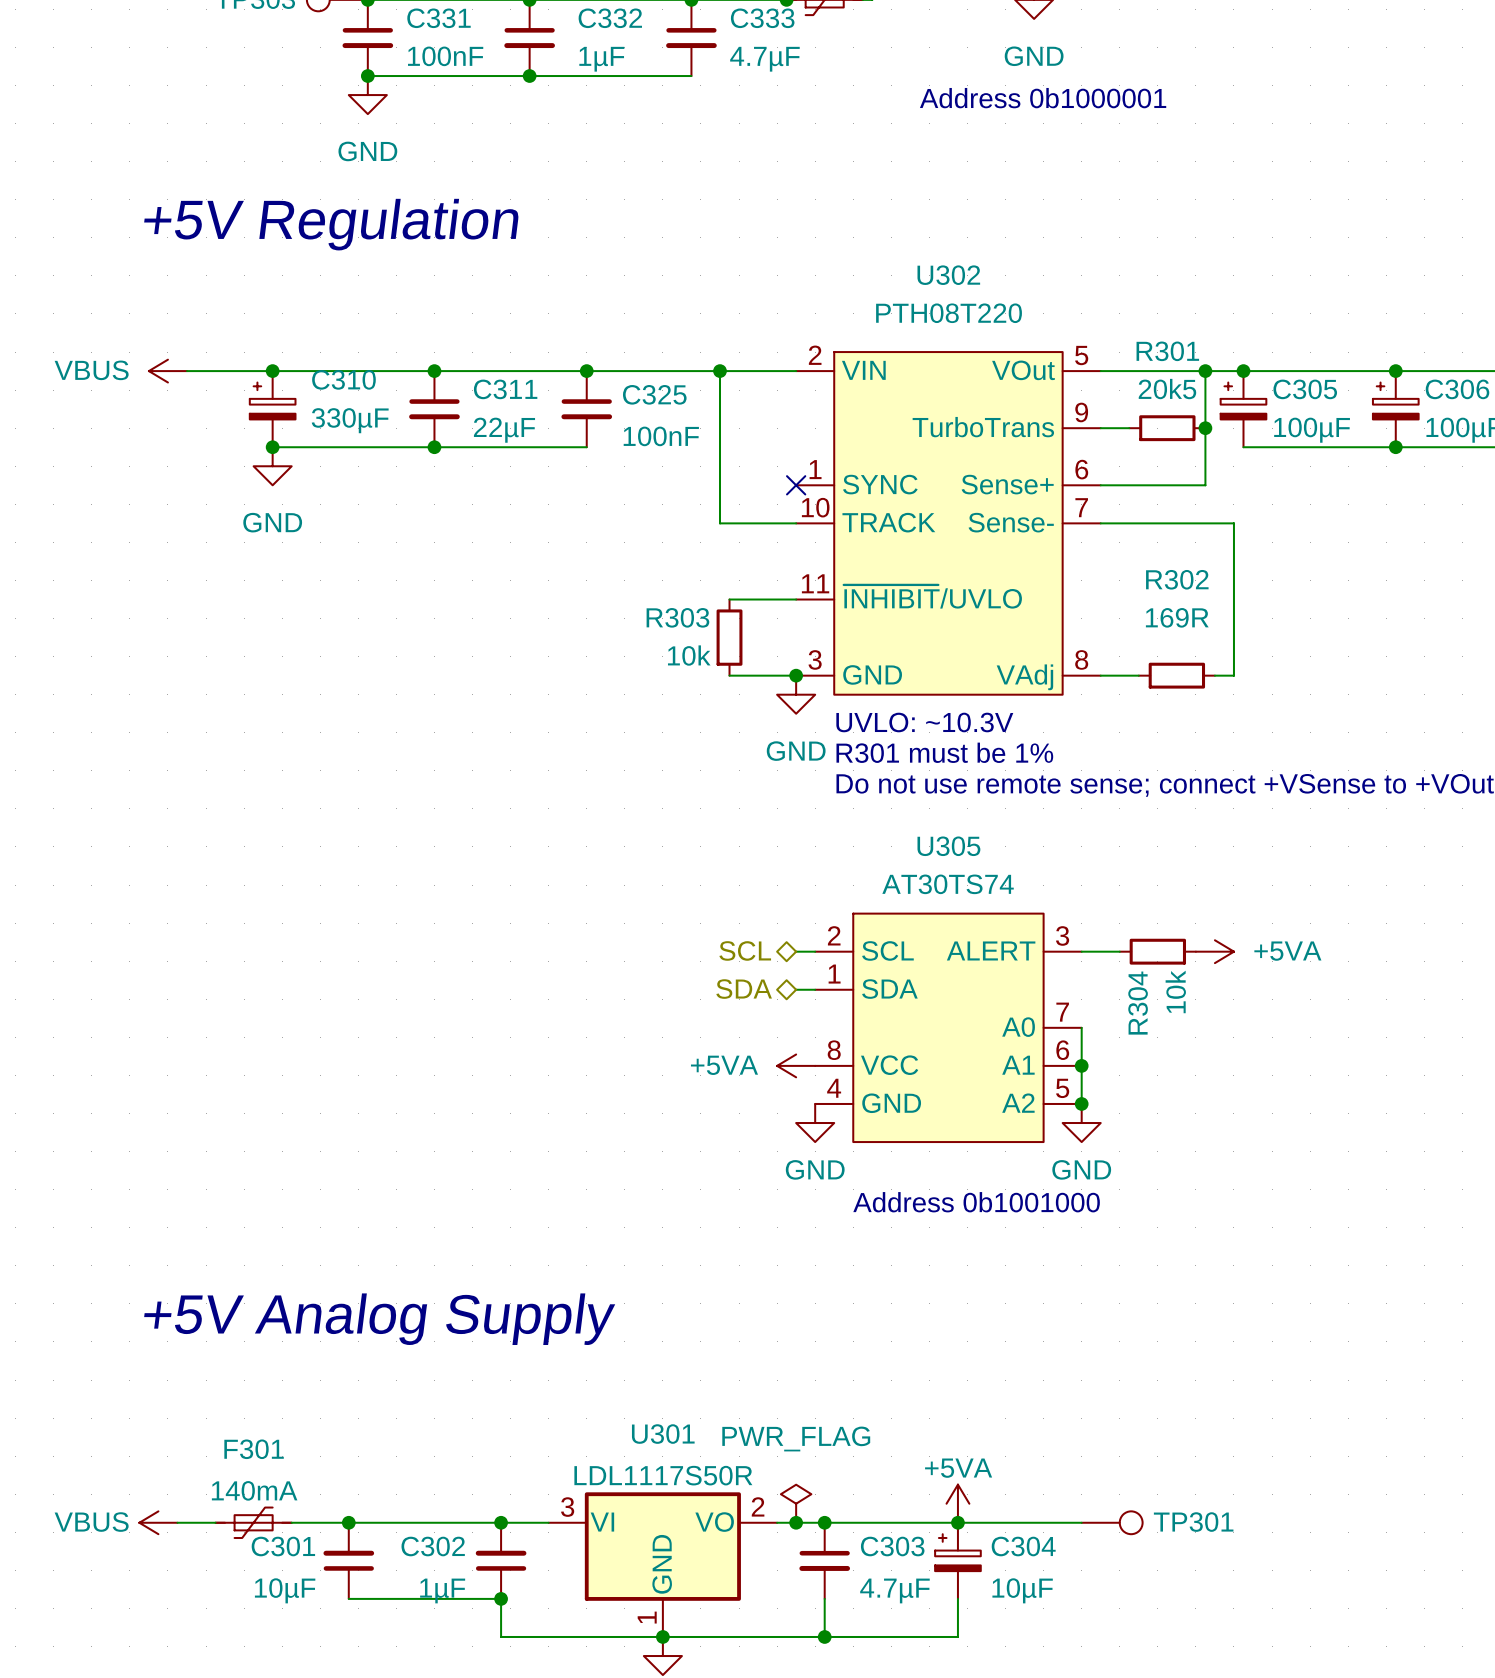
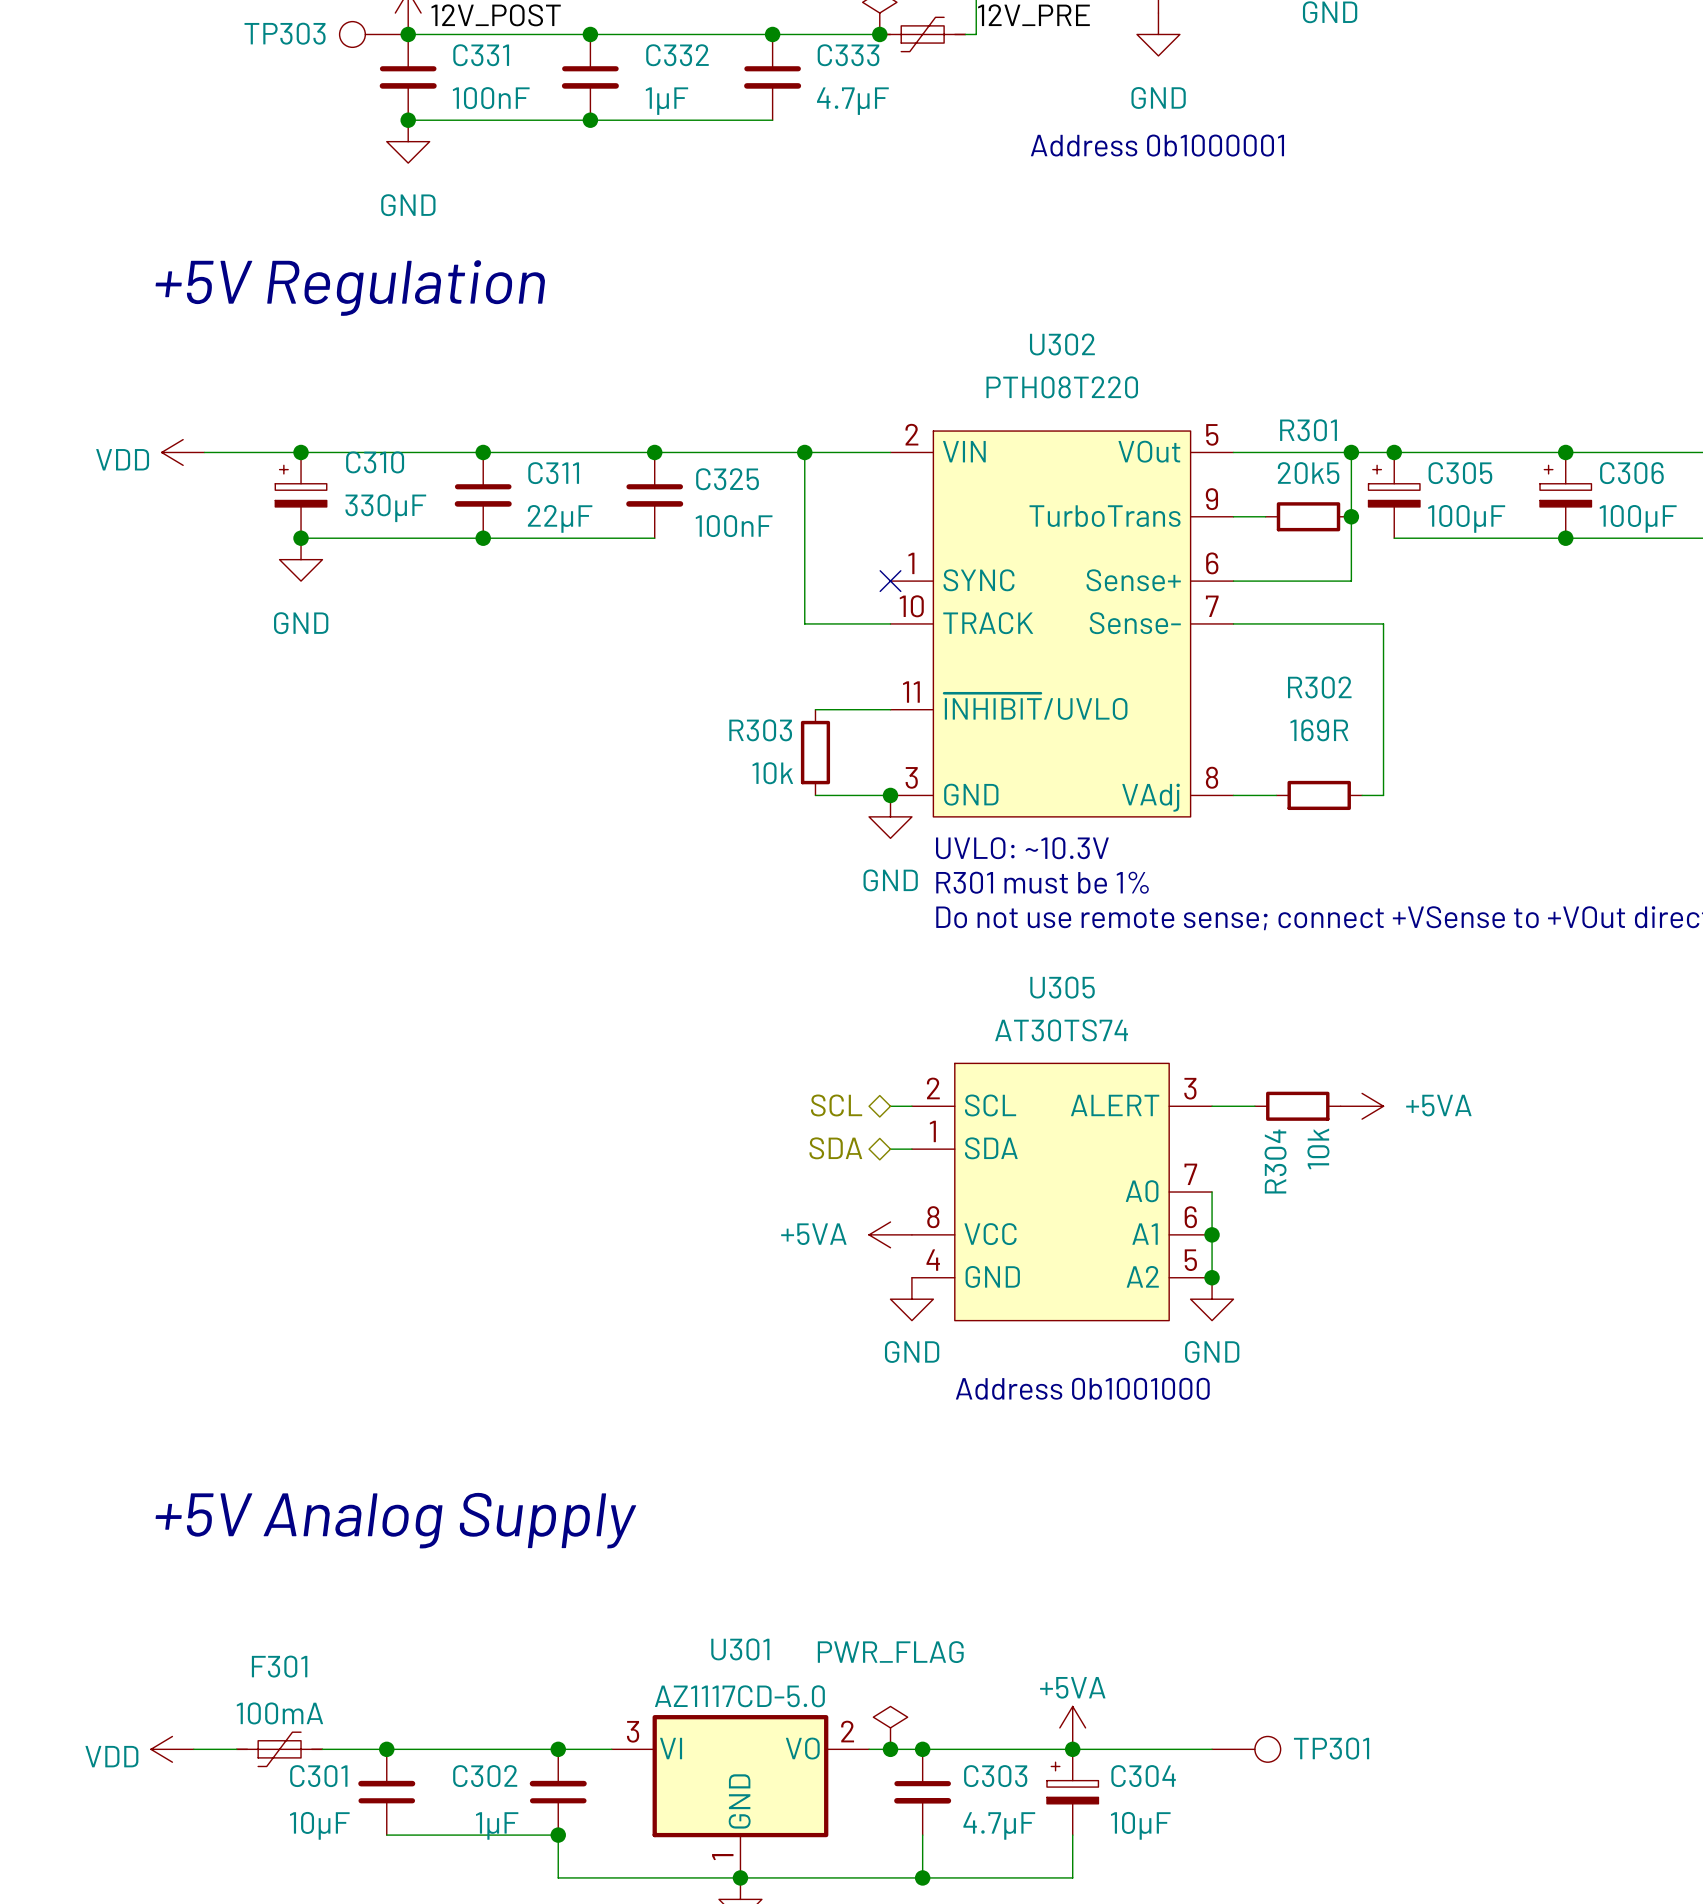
power symbol: VBUS (167, 371) -> VDD (183, 452)
U301 value: LDL1117S50R (663, 1475) -> AZ1117CD-5.0 (739, 1696)
F301 value: 140mA (254, 1490) -> 100mA (279, 1713)
power symbol: VBUS (158, 1522) -> VDD (172, 1749)

